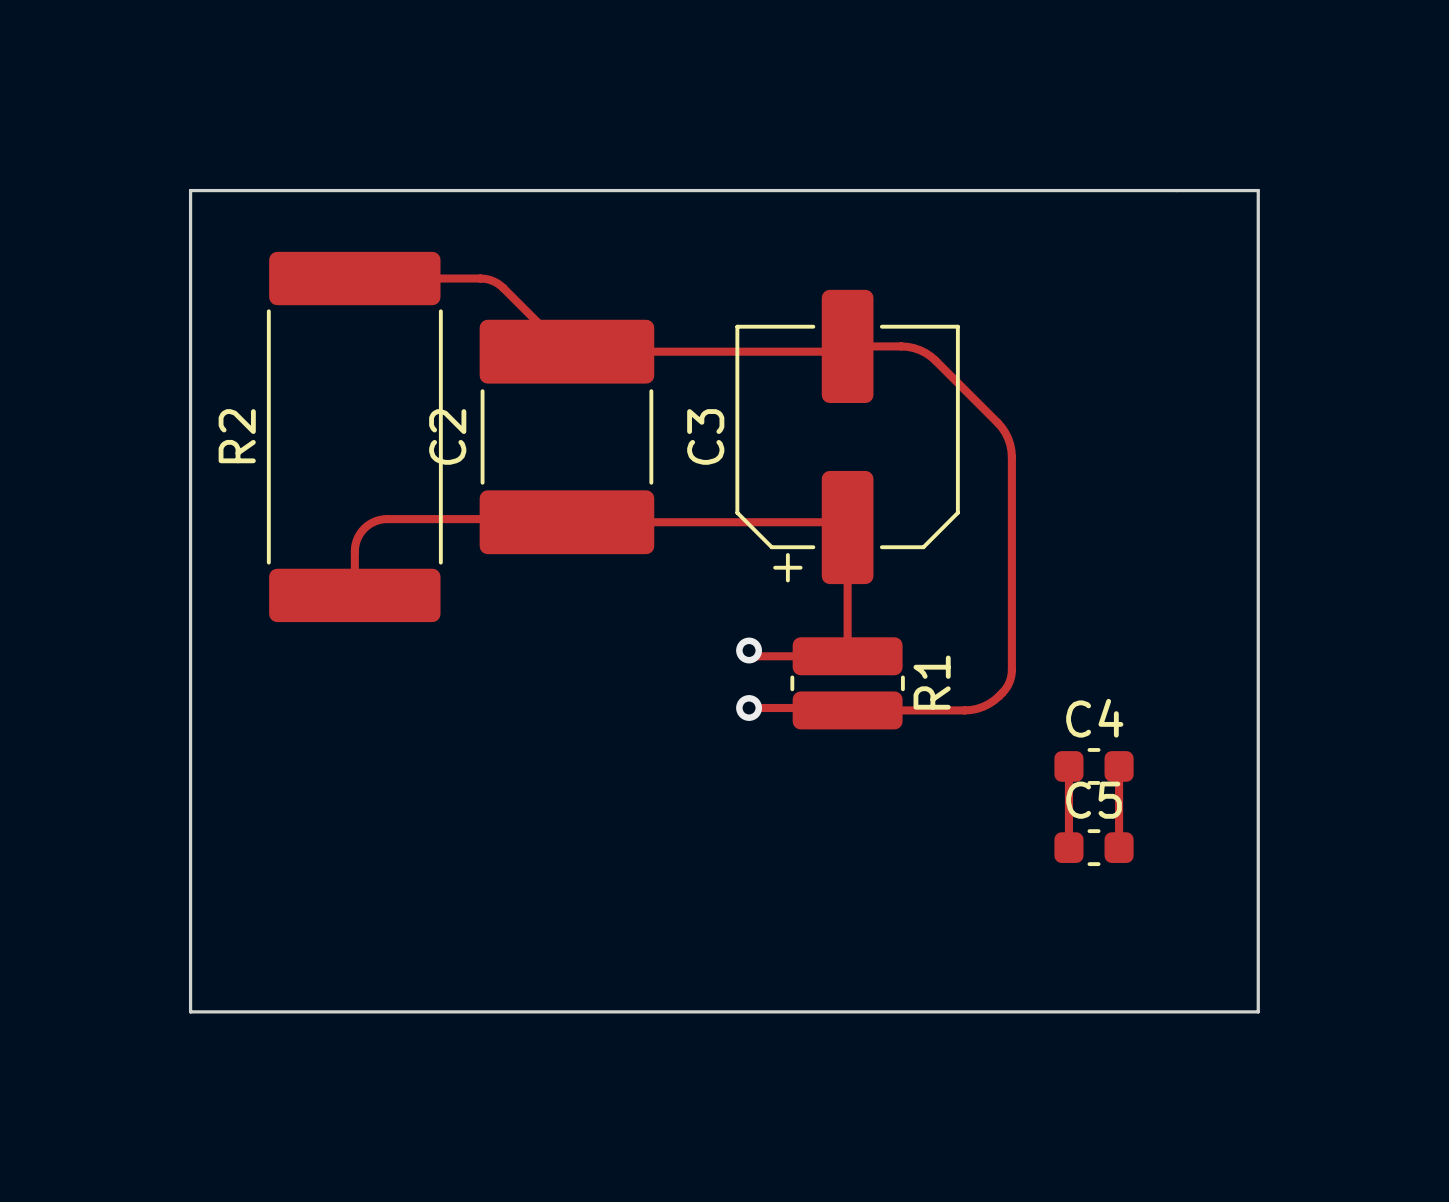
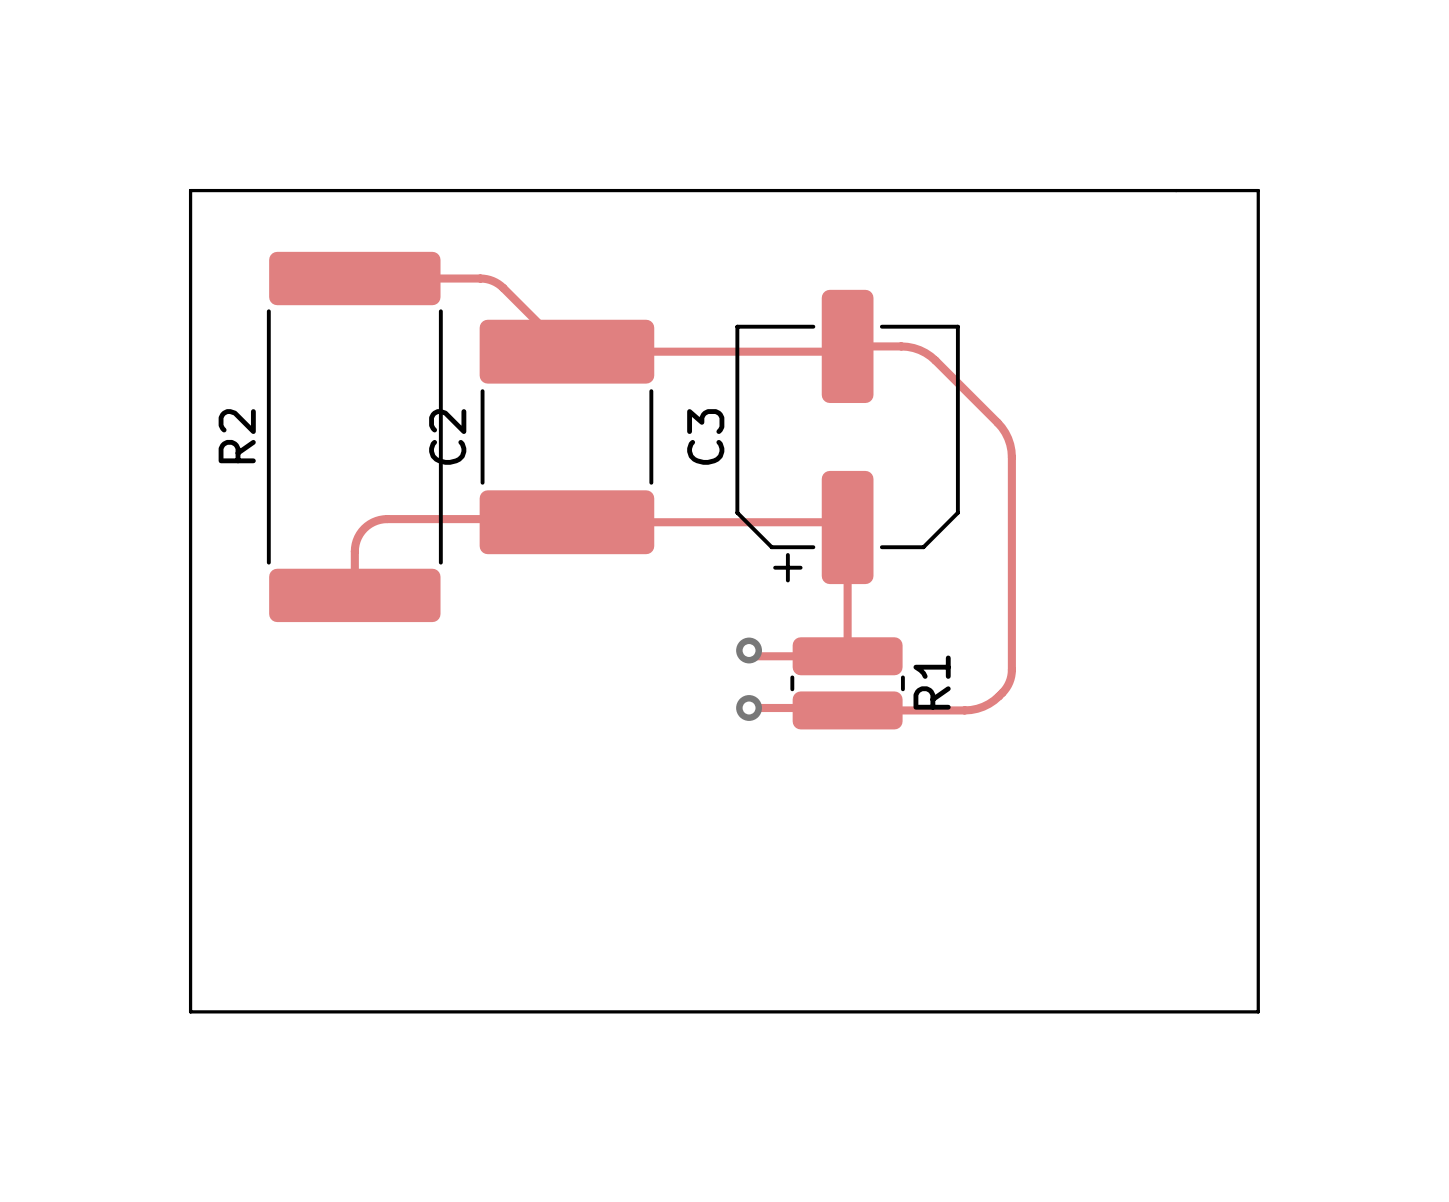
track: (1068, 766) (1068, 847) -> none
C4: (1094, 766) -> none
track: (1119, 766) (1119, 847) -> none
C5: (1094, 847) -> none

